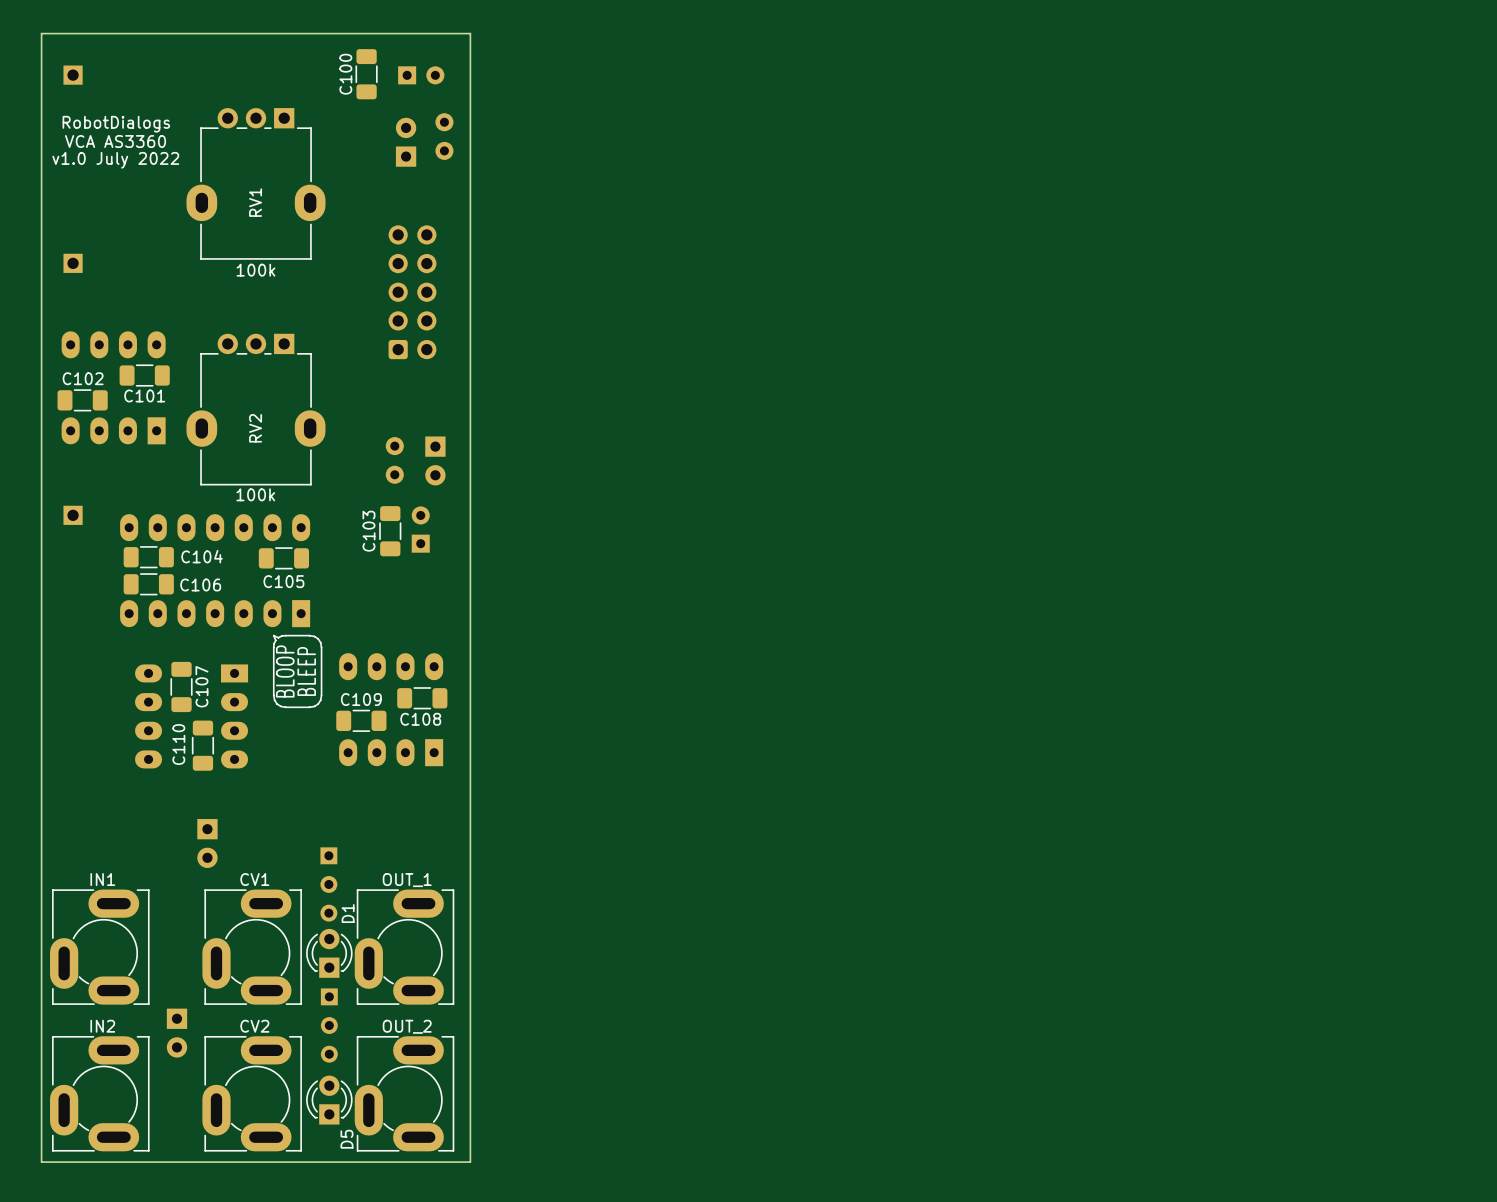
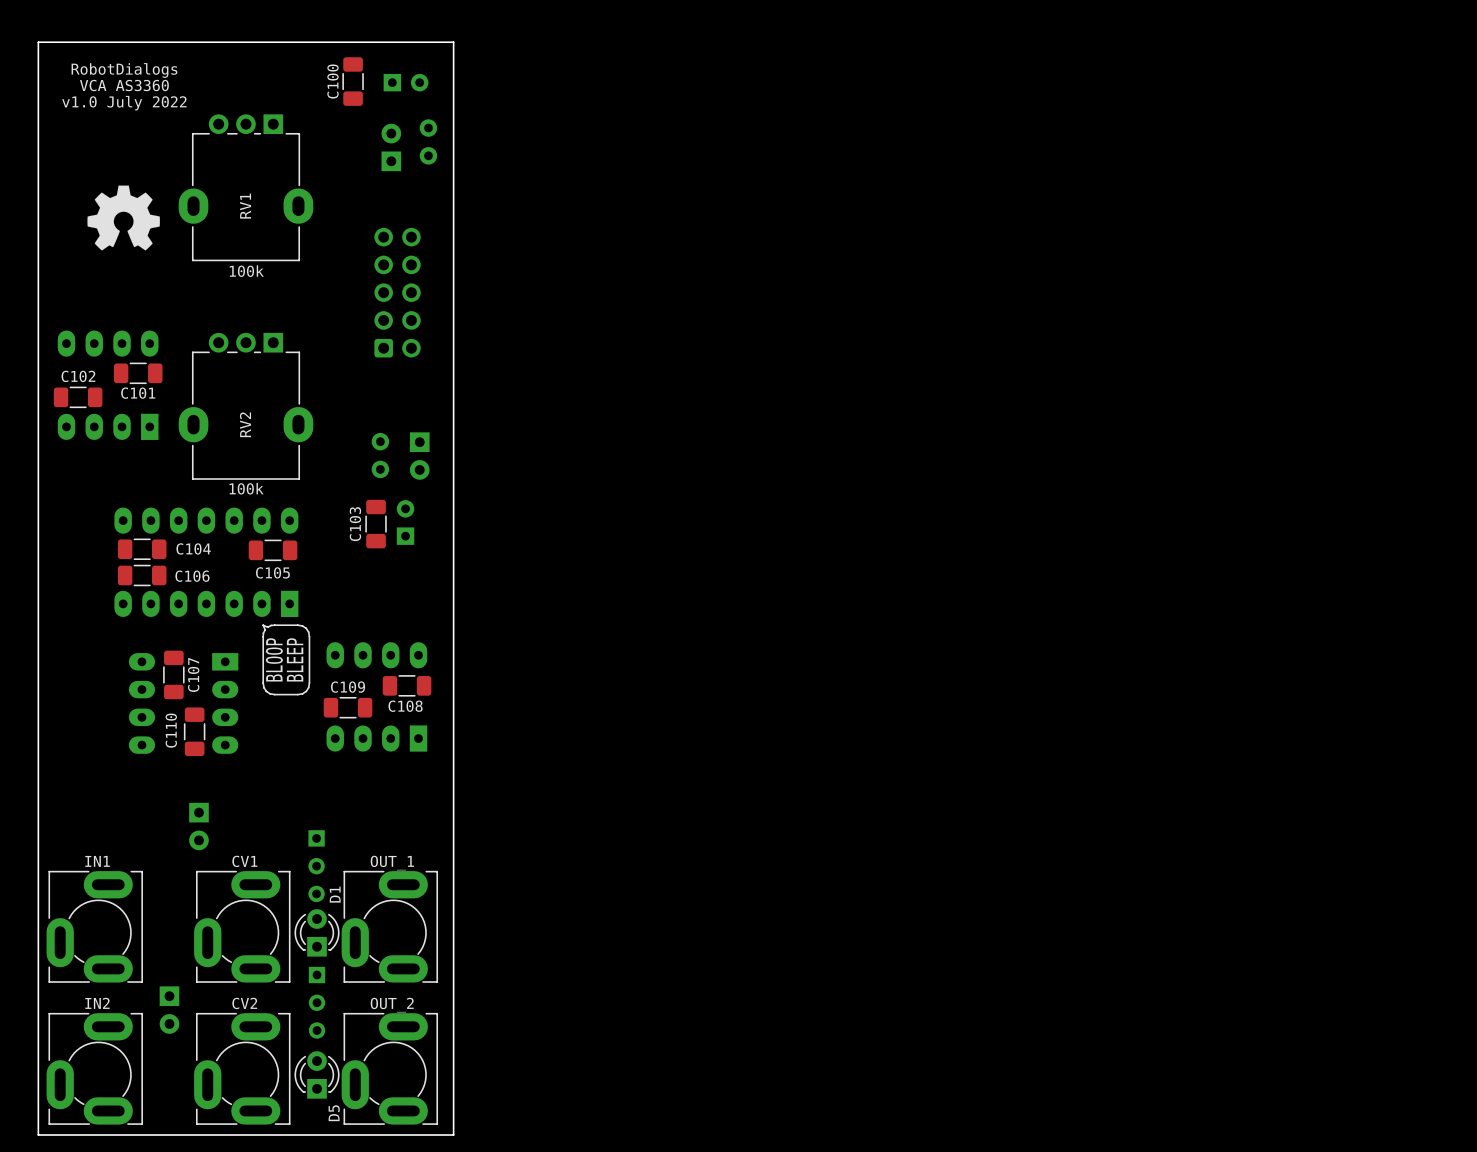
part: (73, 75) -> none
text position: RobotDialogs (116, 124) -> RobotDialogs (124, 70)
text position: VCA AS3360 (115, 141) -> VCA AS3360 (124, 85)
text position: v1.0 July 2022 (115, 160) -> v1.0 July 2022 (124, 103)
drawing: none -> [87, 185, 160, 251]
part: (73, 263) -> none
part: (73, 515) -> none

